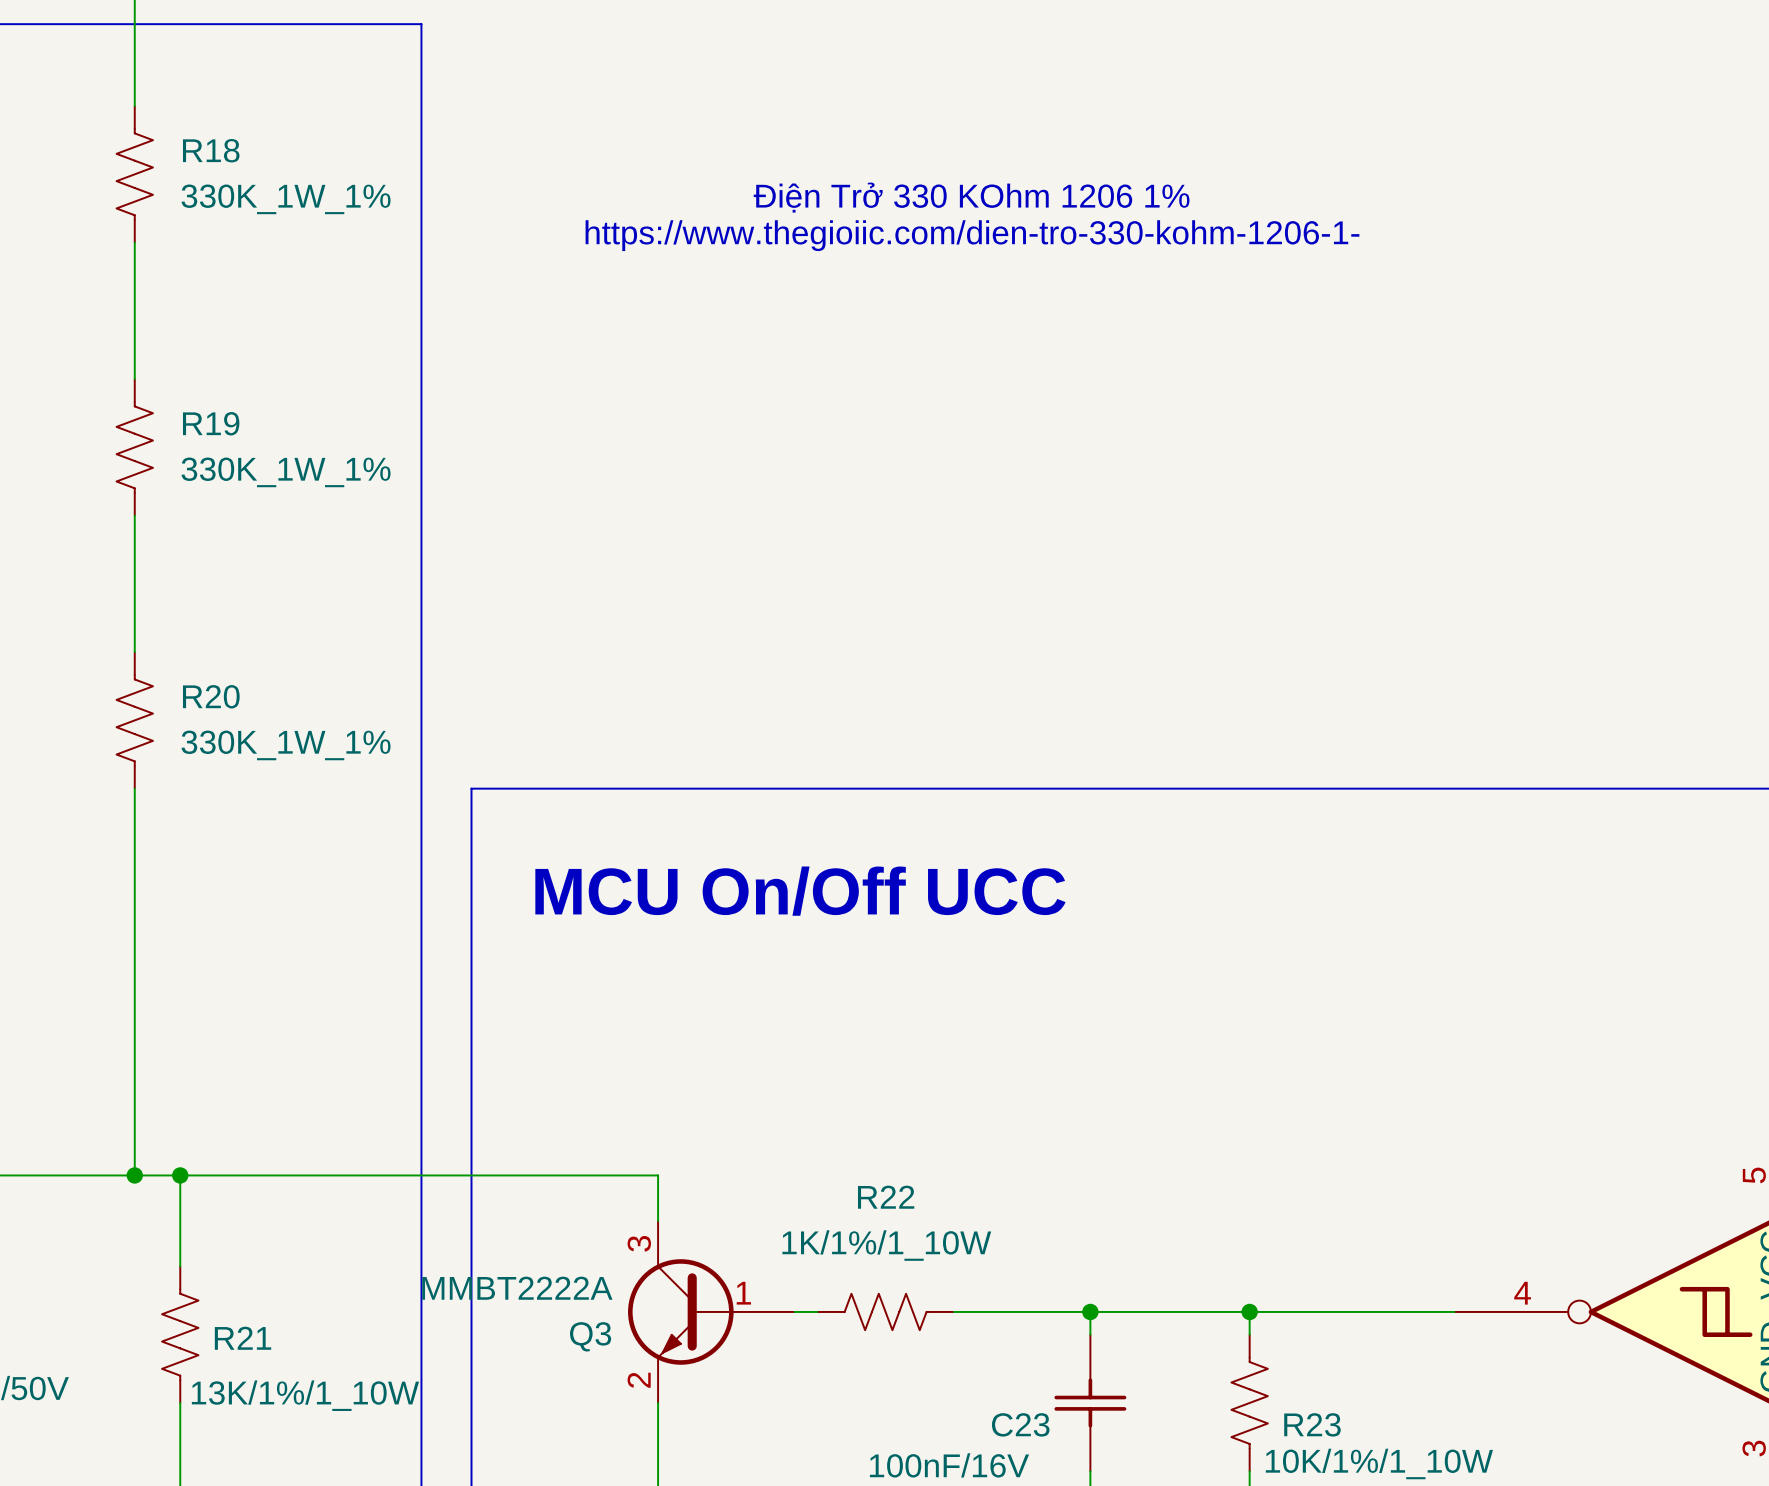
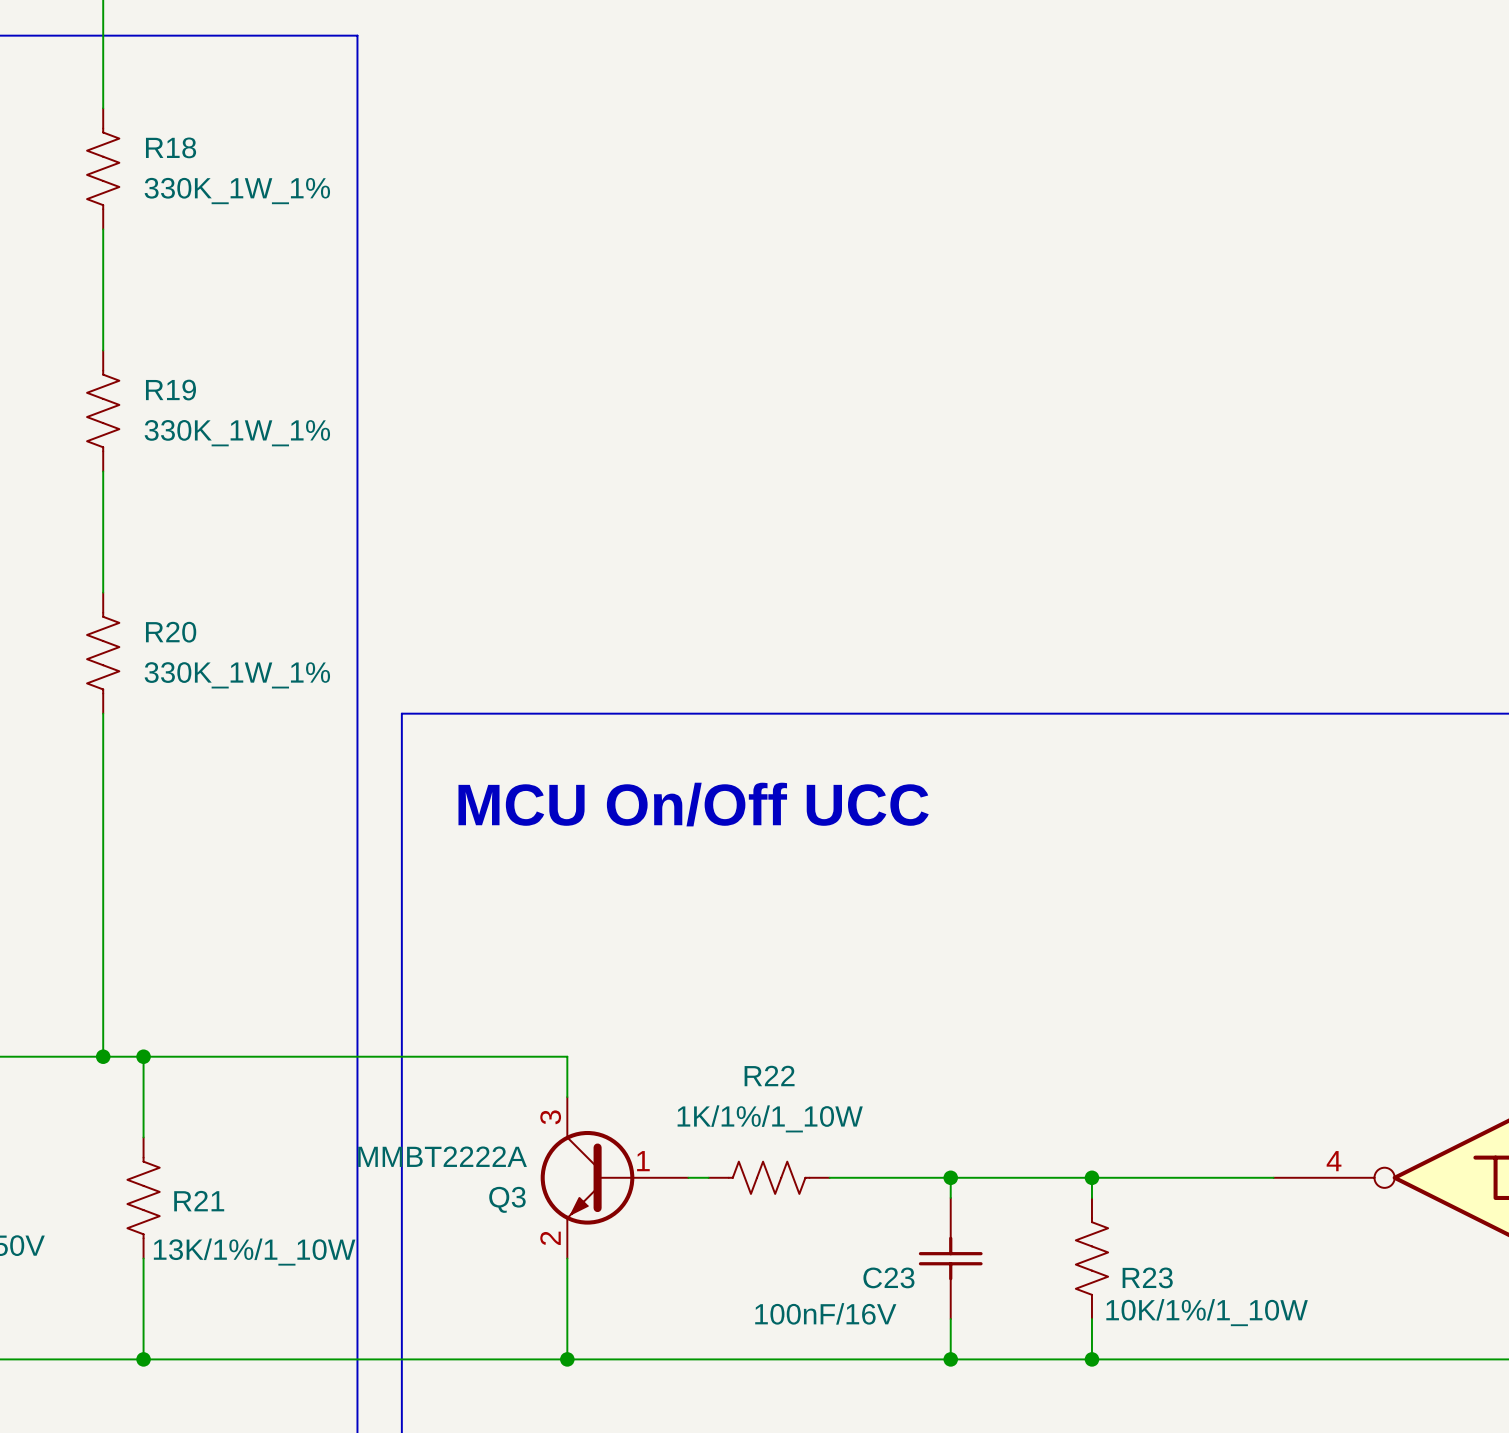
text: Điện Trở 330 KOhm 1206 1% (971, 197) -> none
text: https://www.thegioiic.com/dien-tro-330-kohm-1206-1- (972, 235) -> none

